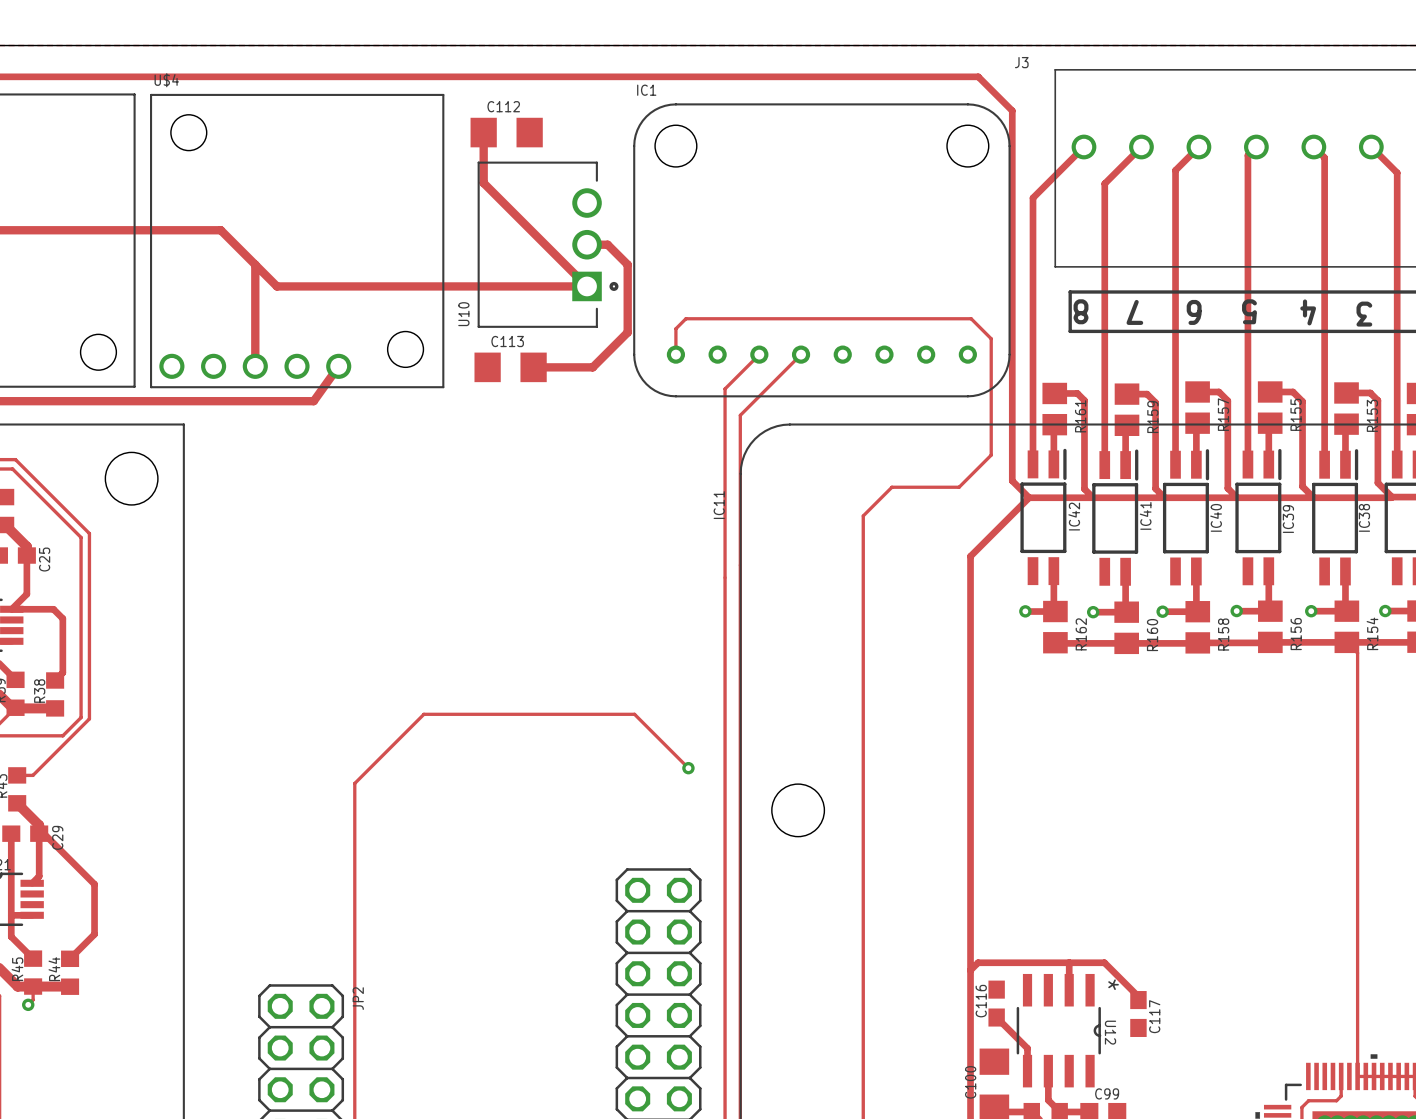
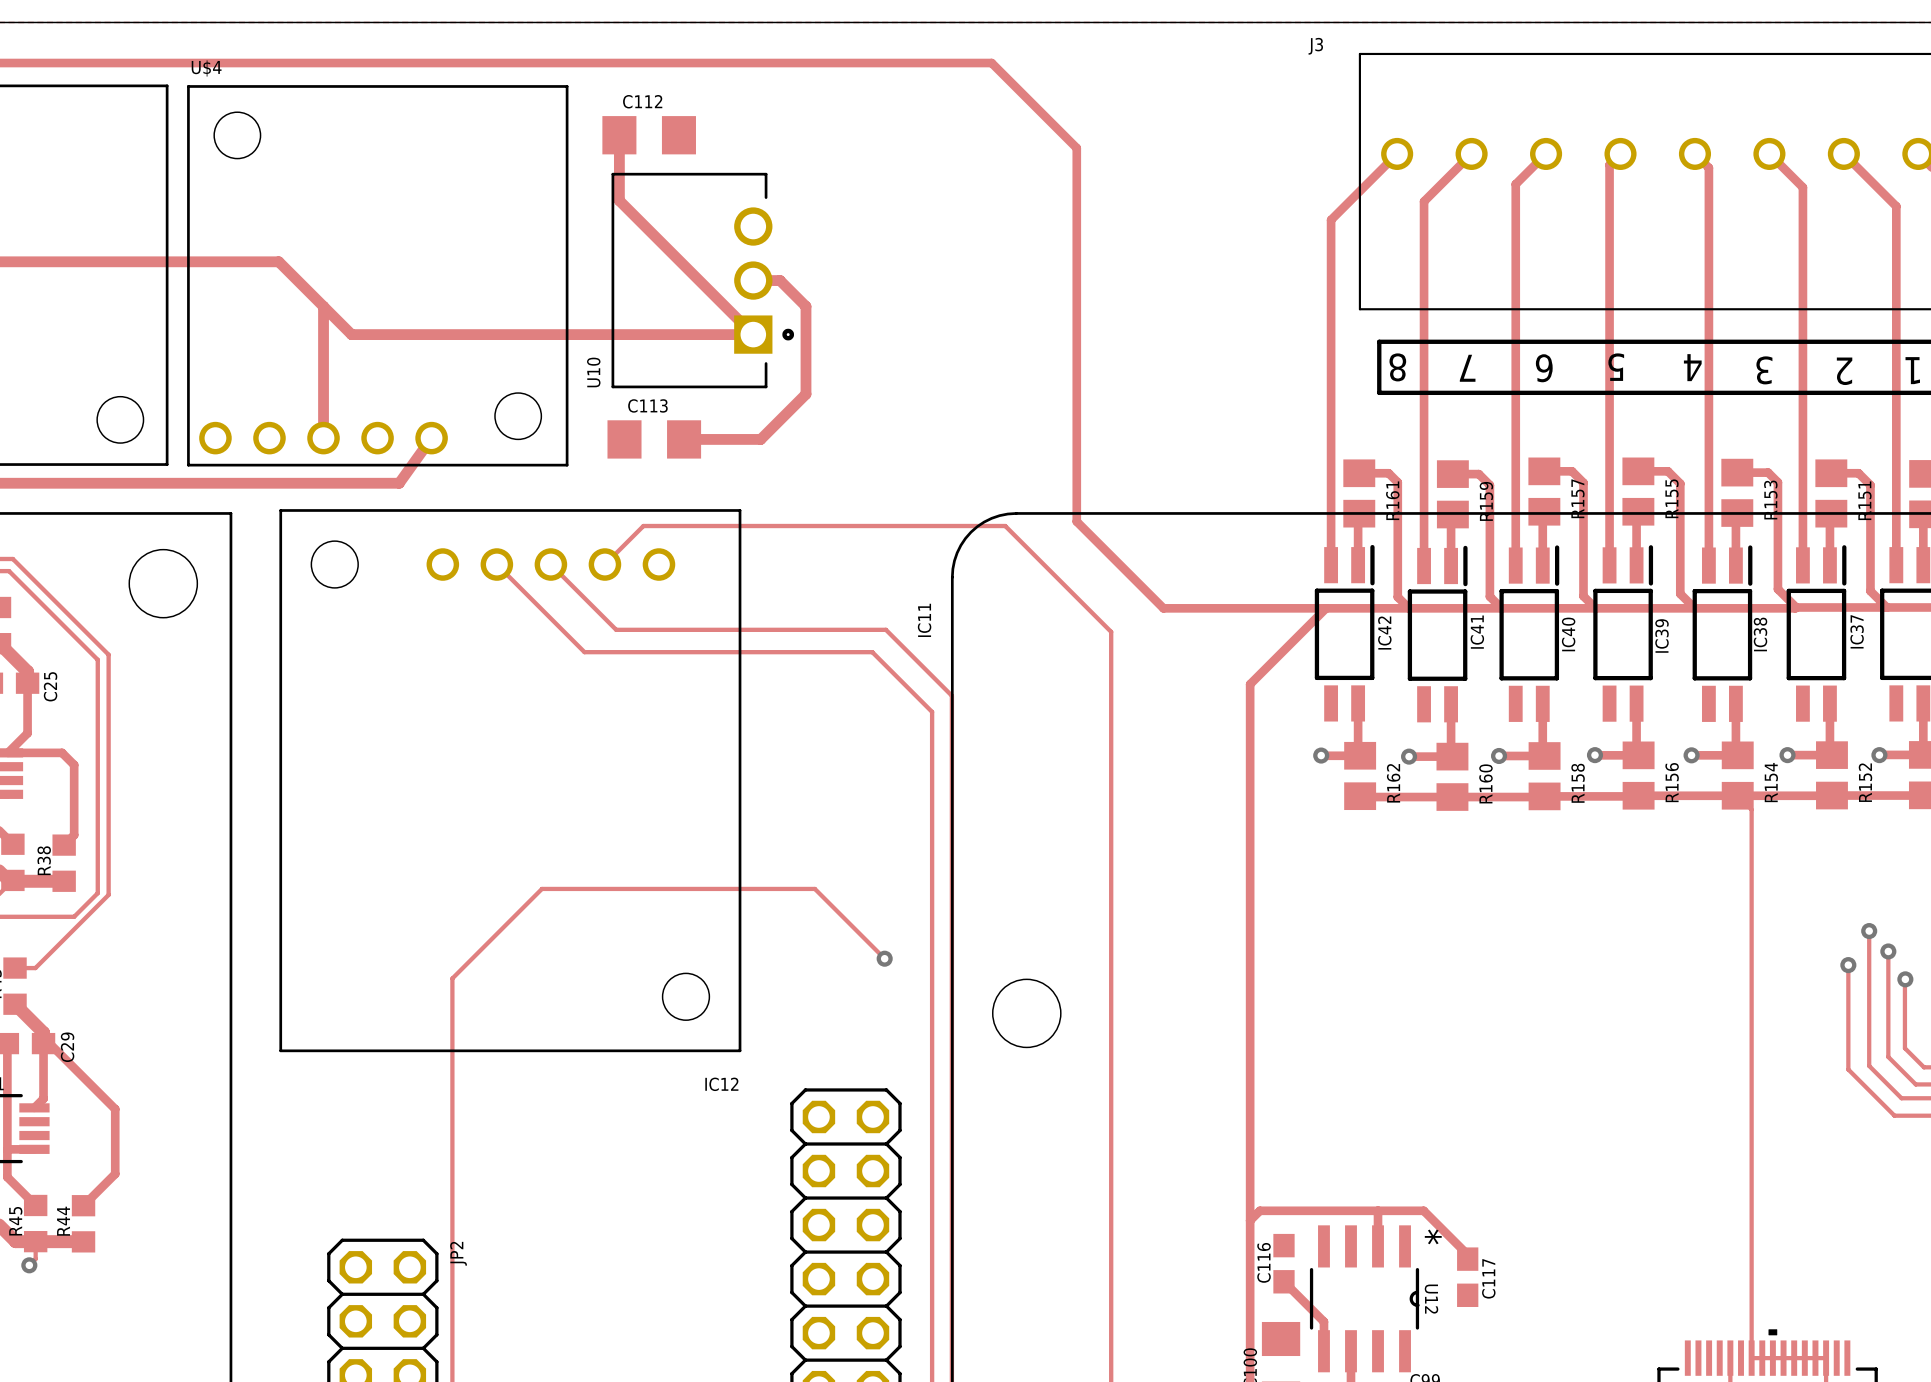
track: (771, 76) (978, 76) (1012, 110) (1012, 480) (1029, 497) -> (991, 63) (1076, 148) (1076, 521) (1163, 608) (1326, 608)
IC1: (821, 250) -> none
track: (675, 354) (675, 328) (685, 318) (971, 318) (991, 338) (991, 455) (959, 487) (891, 487) (863, 515) -> (604, 564) (643, 526) (1005, 526) (1111, 631)
track: (759, 354) (725, 388) (725, 577) -> (496, 564) (584, 652) (872, 652) (932, 711)
track: (801, 354) (740, 415) (740, 565) -> (550, 564) (616, 629) (885, 629) (951, 695)
IC12: none -> (510, 780)

